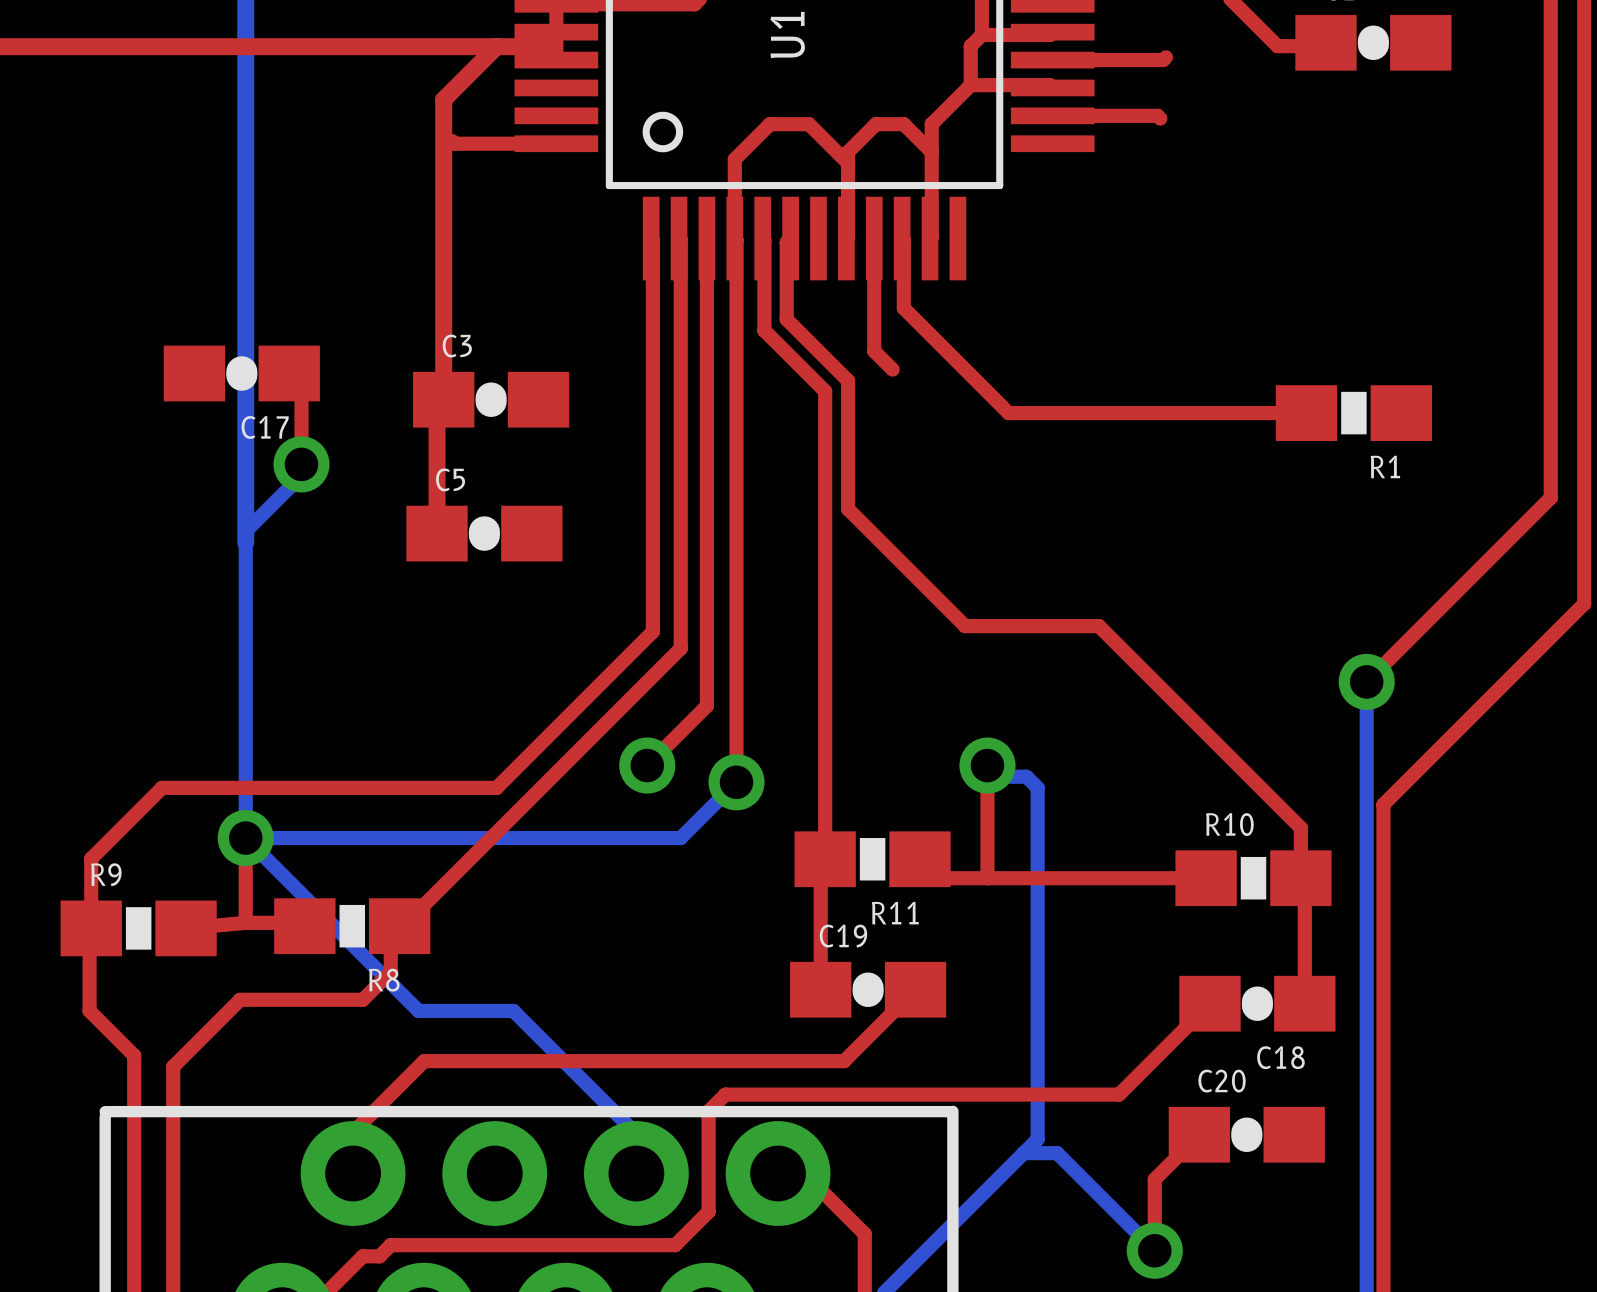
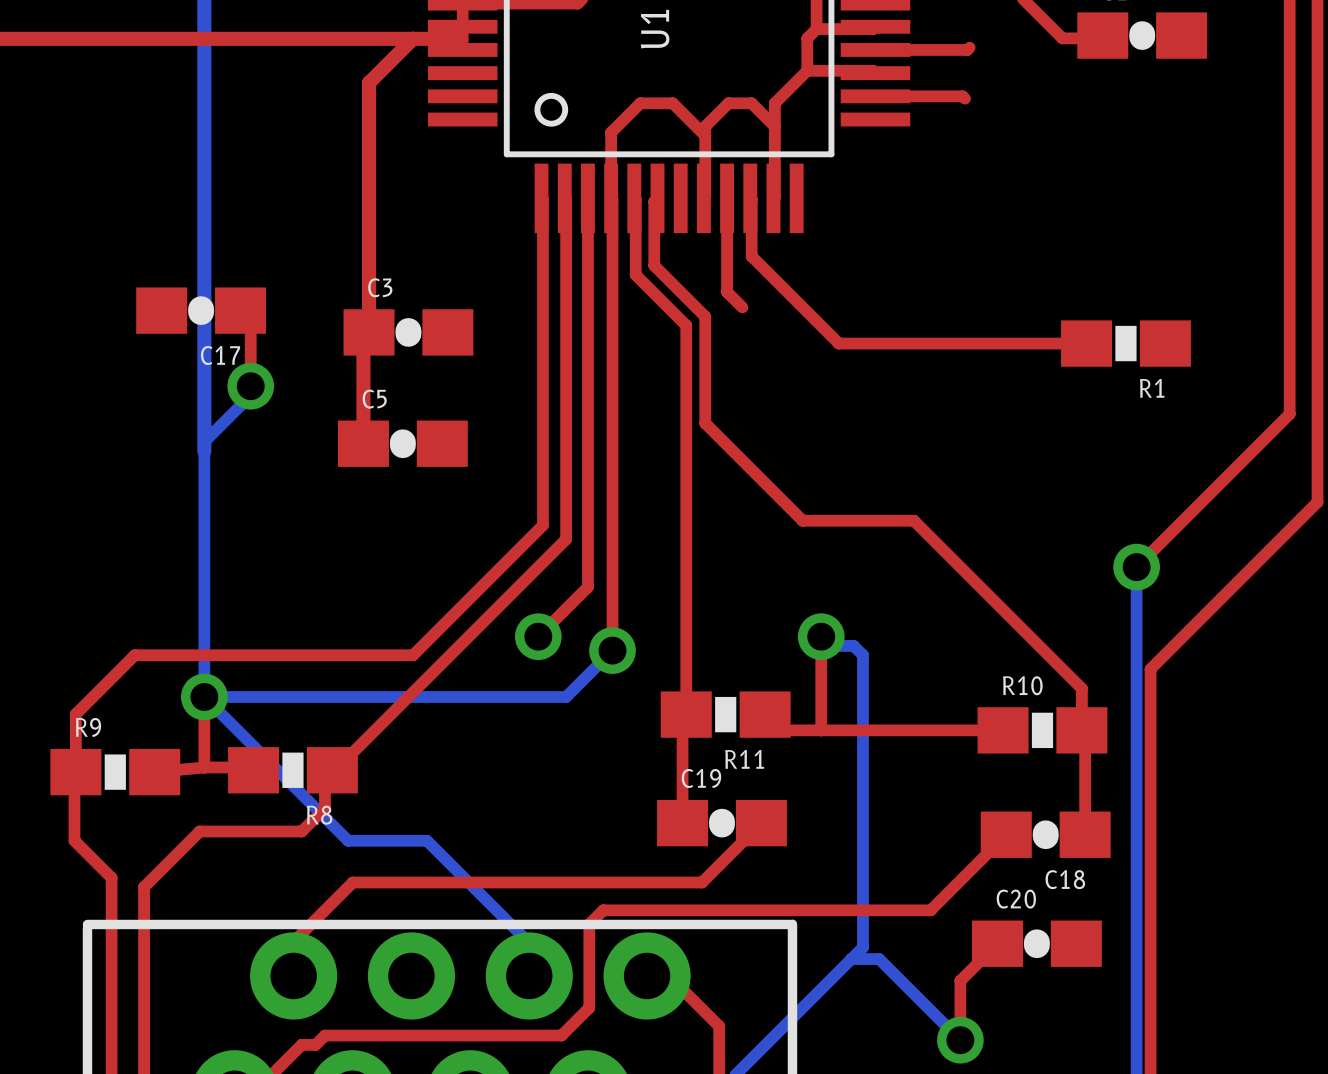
top track: (452, 140) (454, 143) (556, 143) -> none

